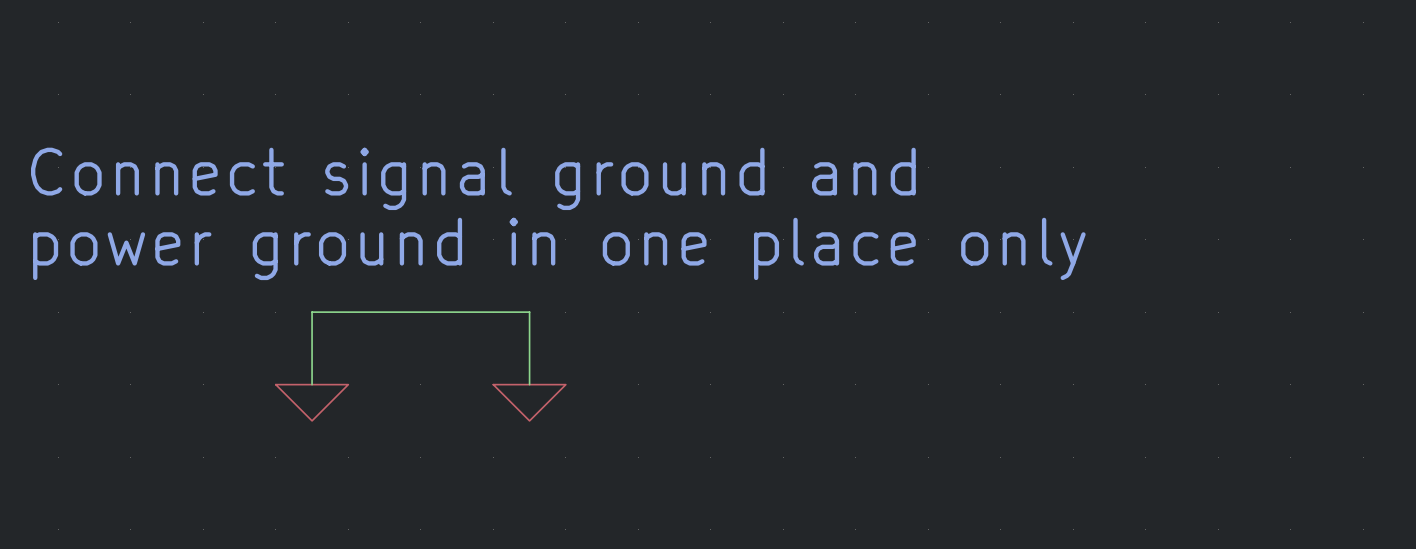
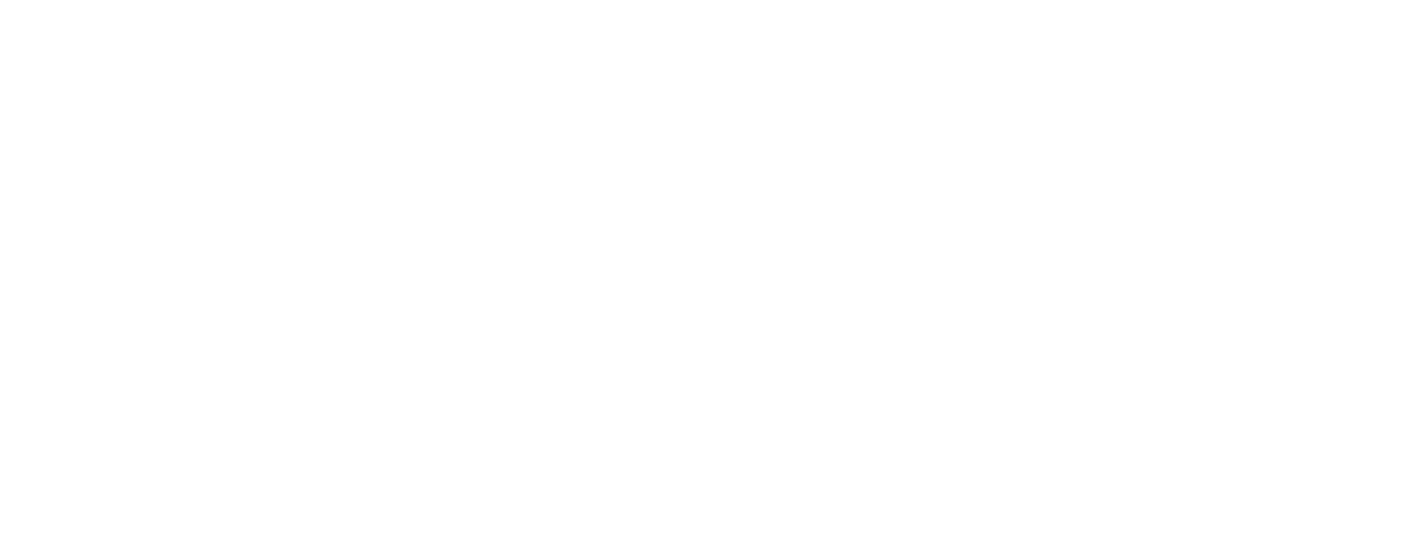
text: Connect signal ground and (473, 178) -> none
text: power ground in one place only (559, 248) -> none
wire: (312, 384) (312, 312) (529, 312) (529, 384) -> none
power symbol: (312, 402) -> none
power symbol: (529, 402) -> none

